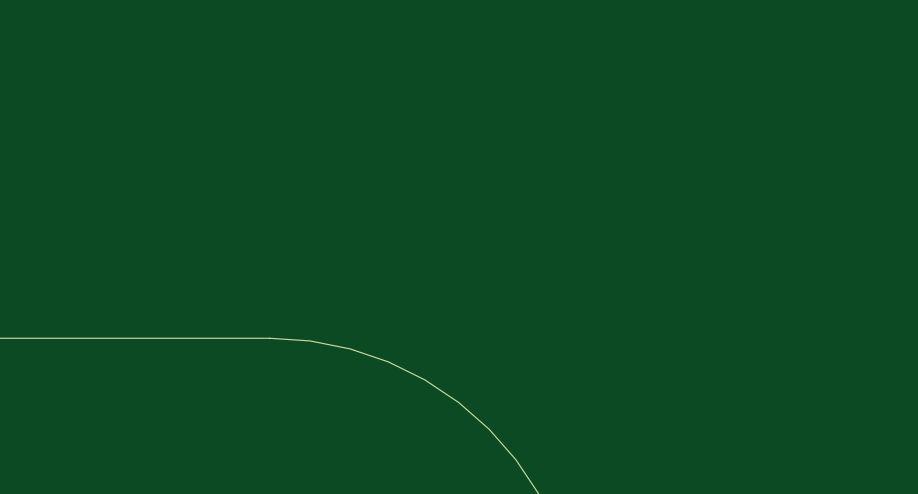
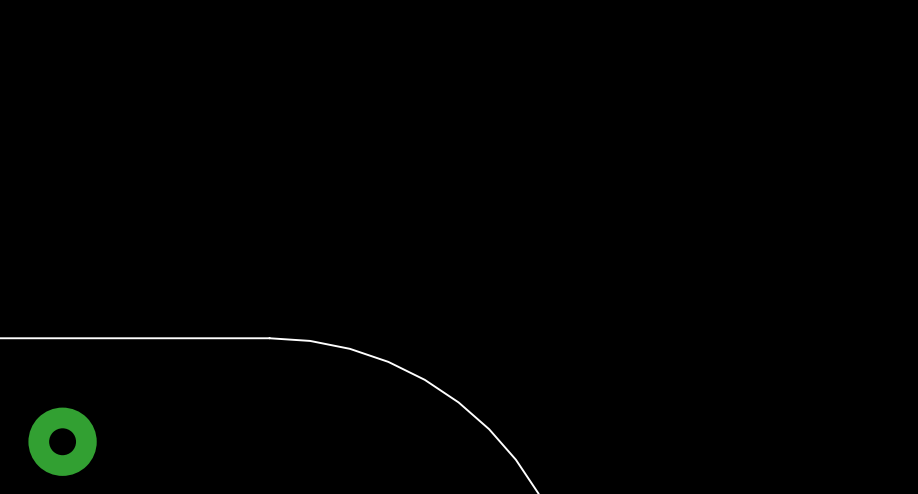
via: none -> (62, 441)

